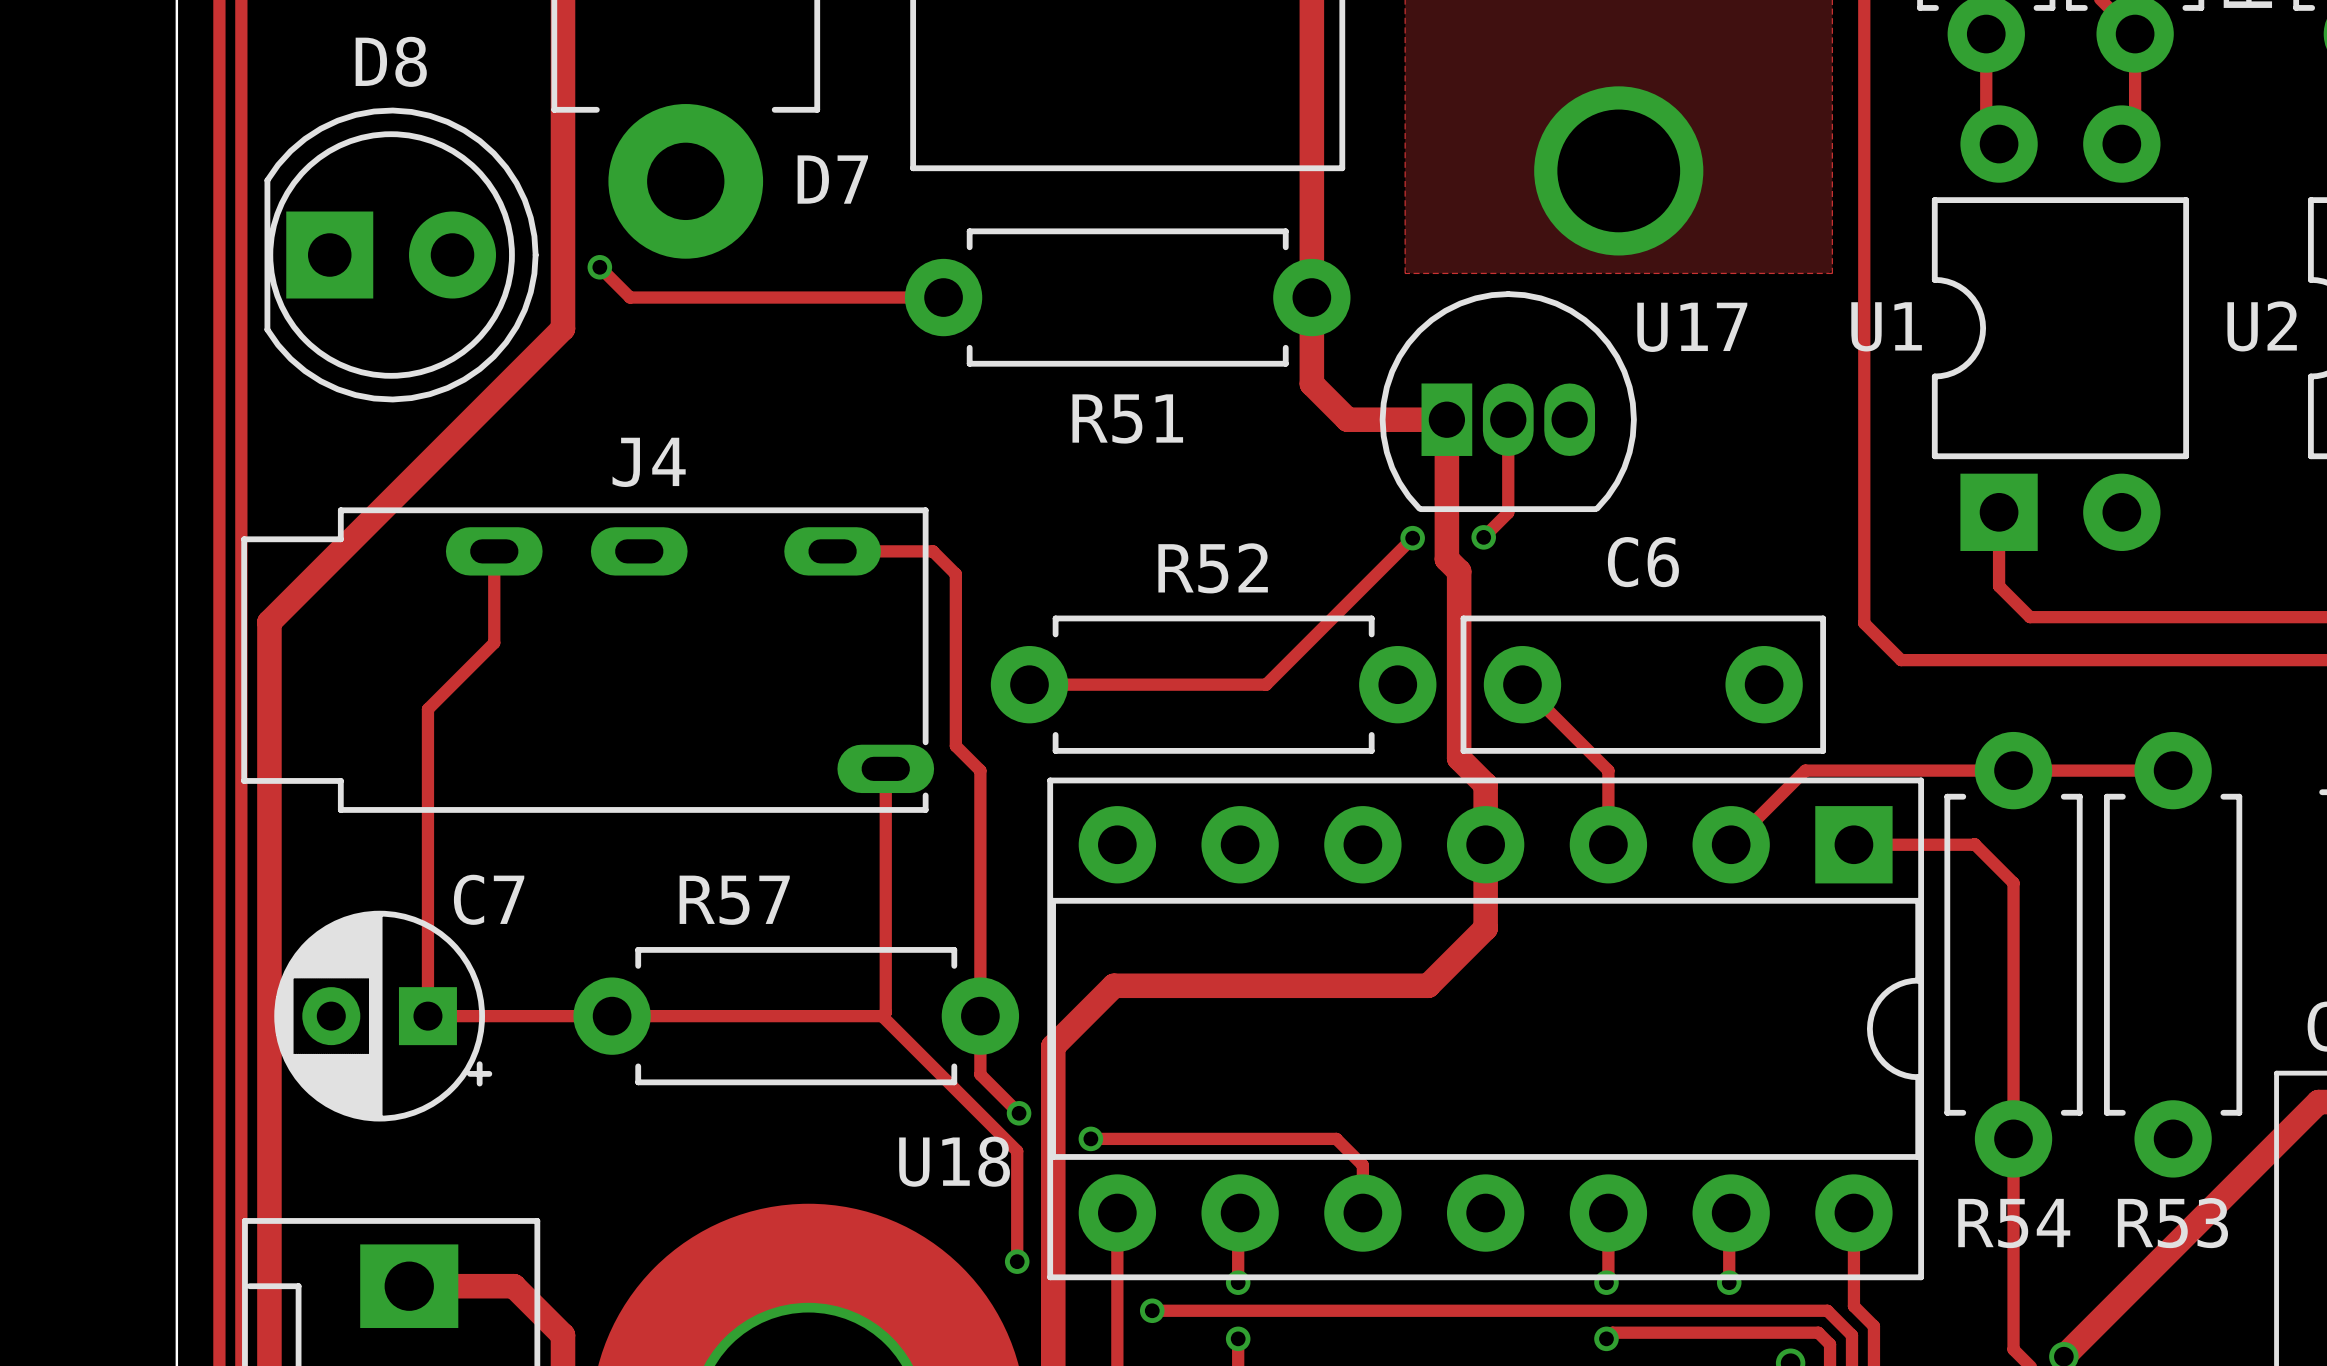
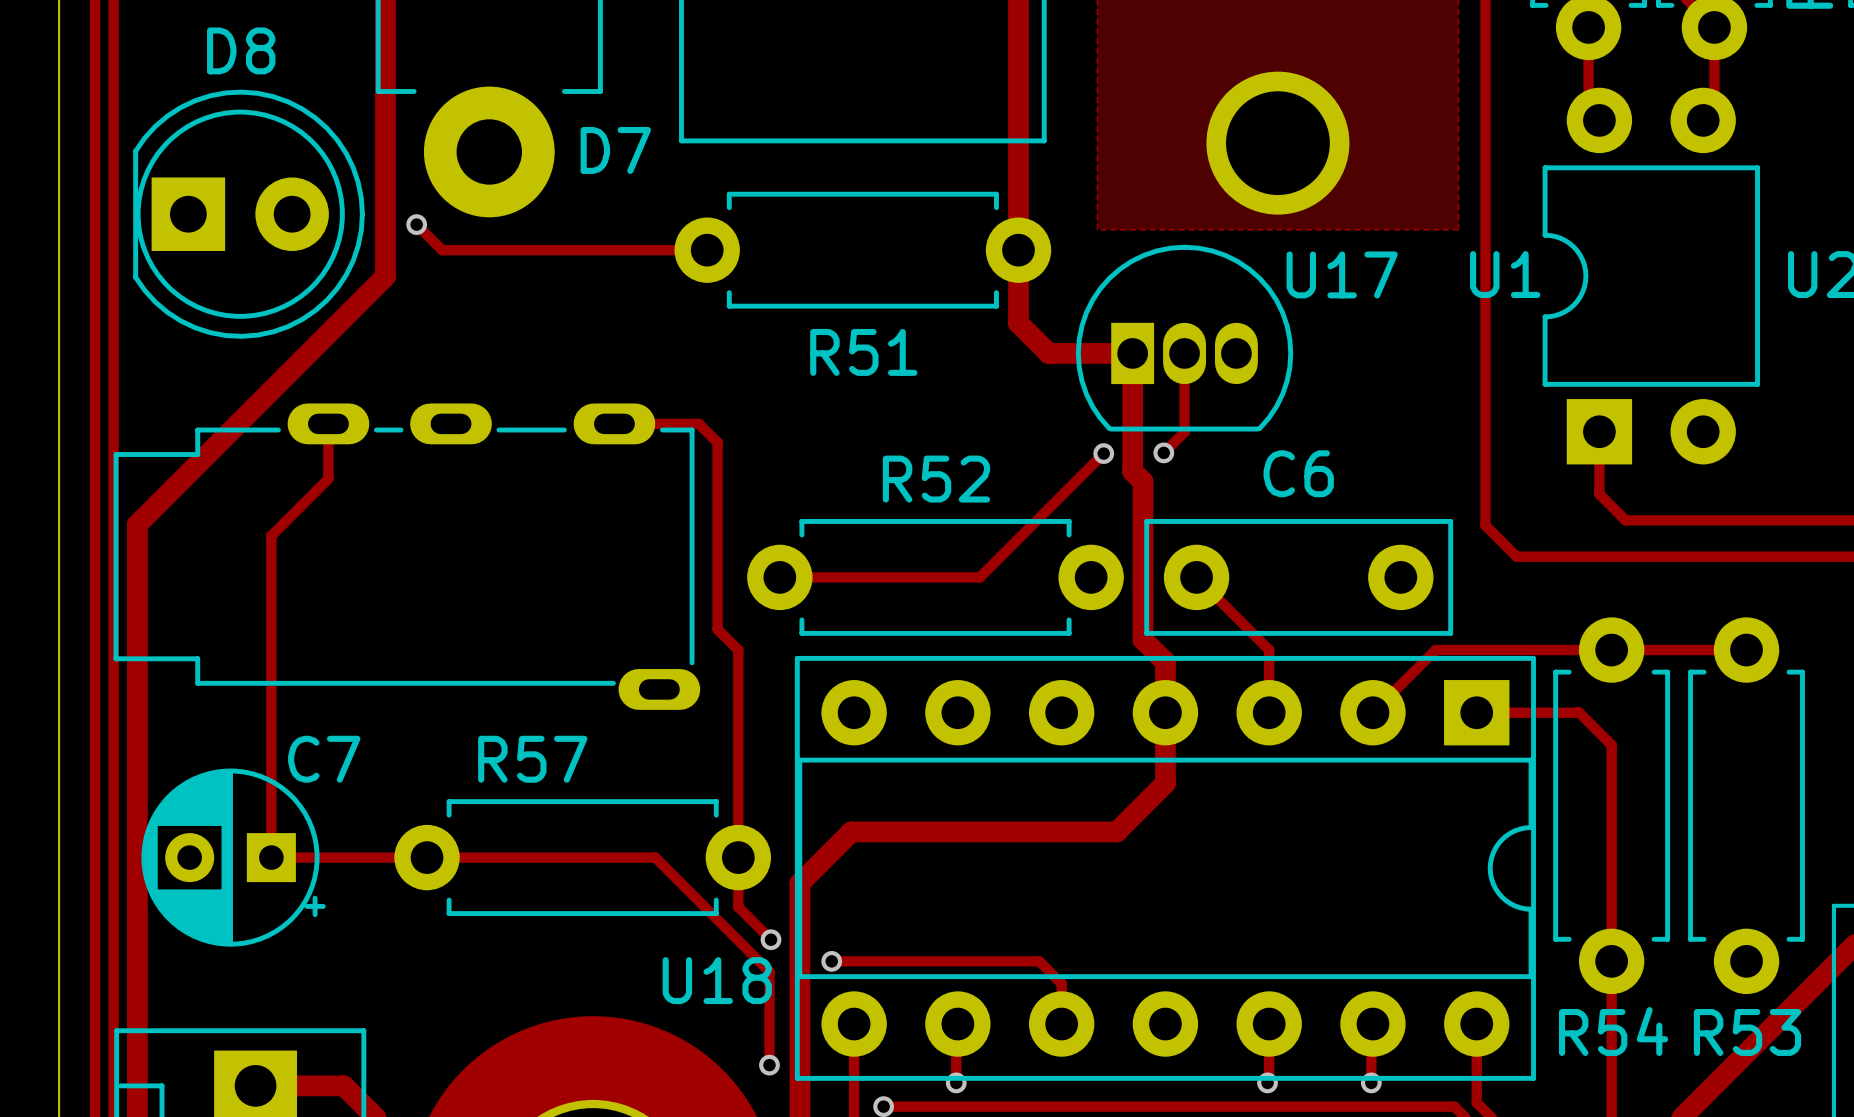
track: (494, 551) (494, 642) (427, 709) -> (328, 423) (328, 478) (271, 535) (271, 598)
track: (832, 551) (933, 551) (955, 574) -> (614, 423) (698, 423) (717, 442) (717, 484)
J4: (587, 660) -> none
part: none -> (406, 556)
track: (885, 768) (885, 1012) (882, 1016) -> none

